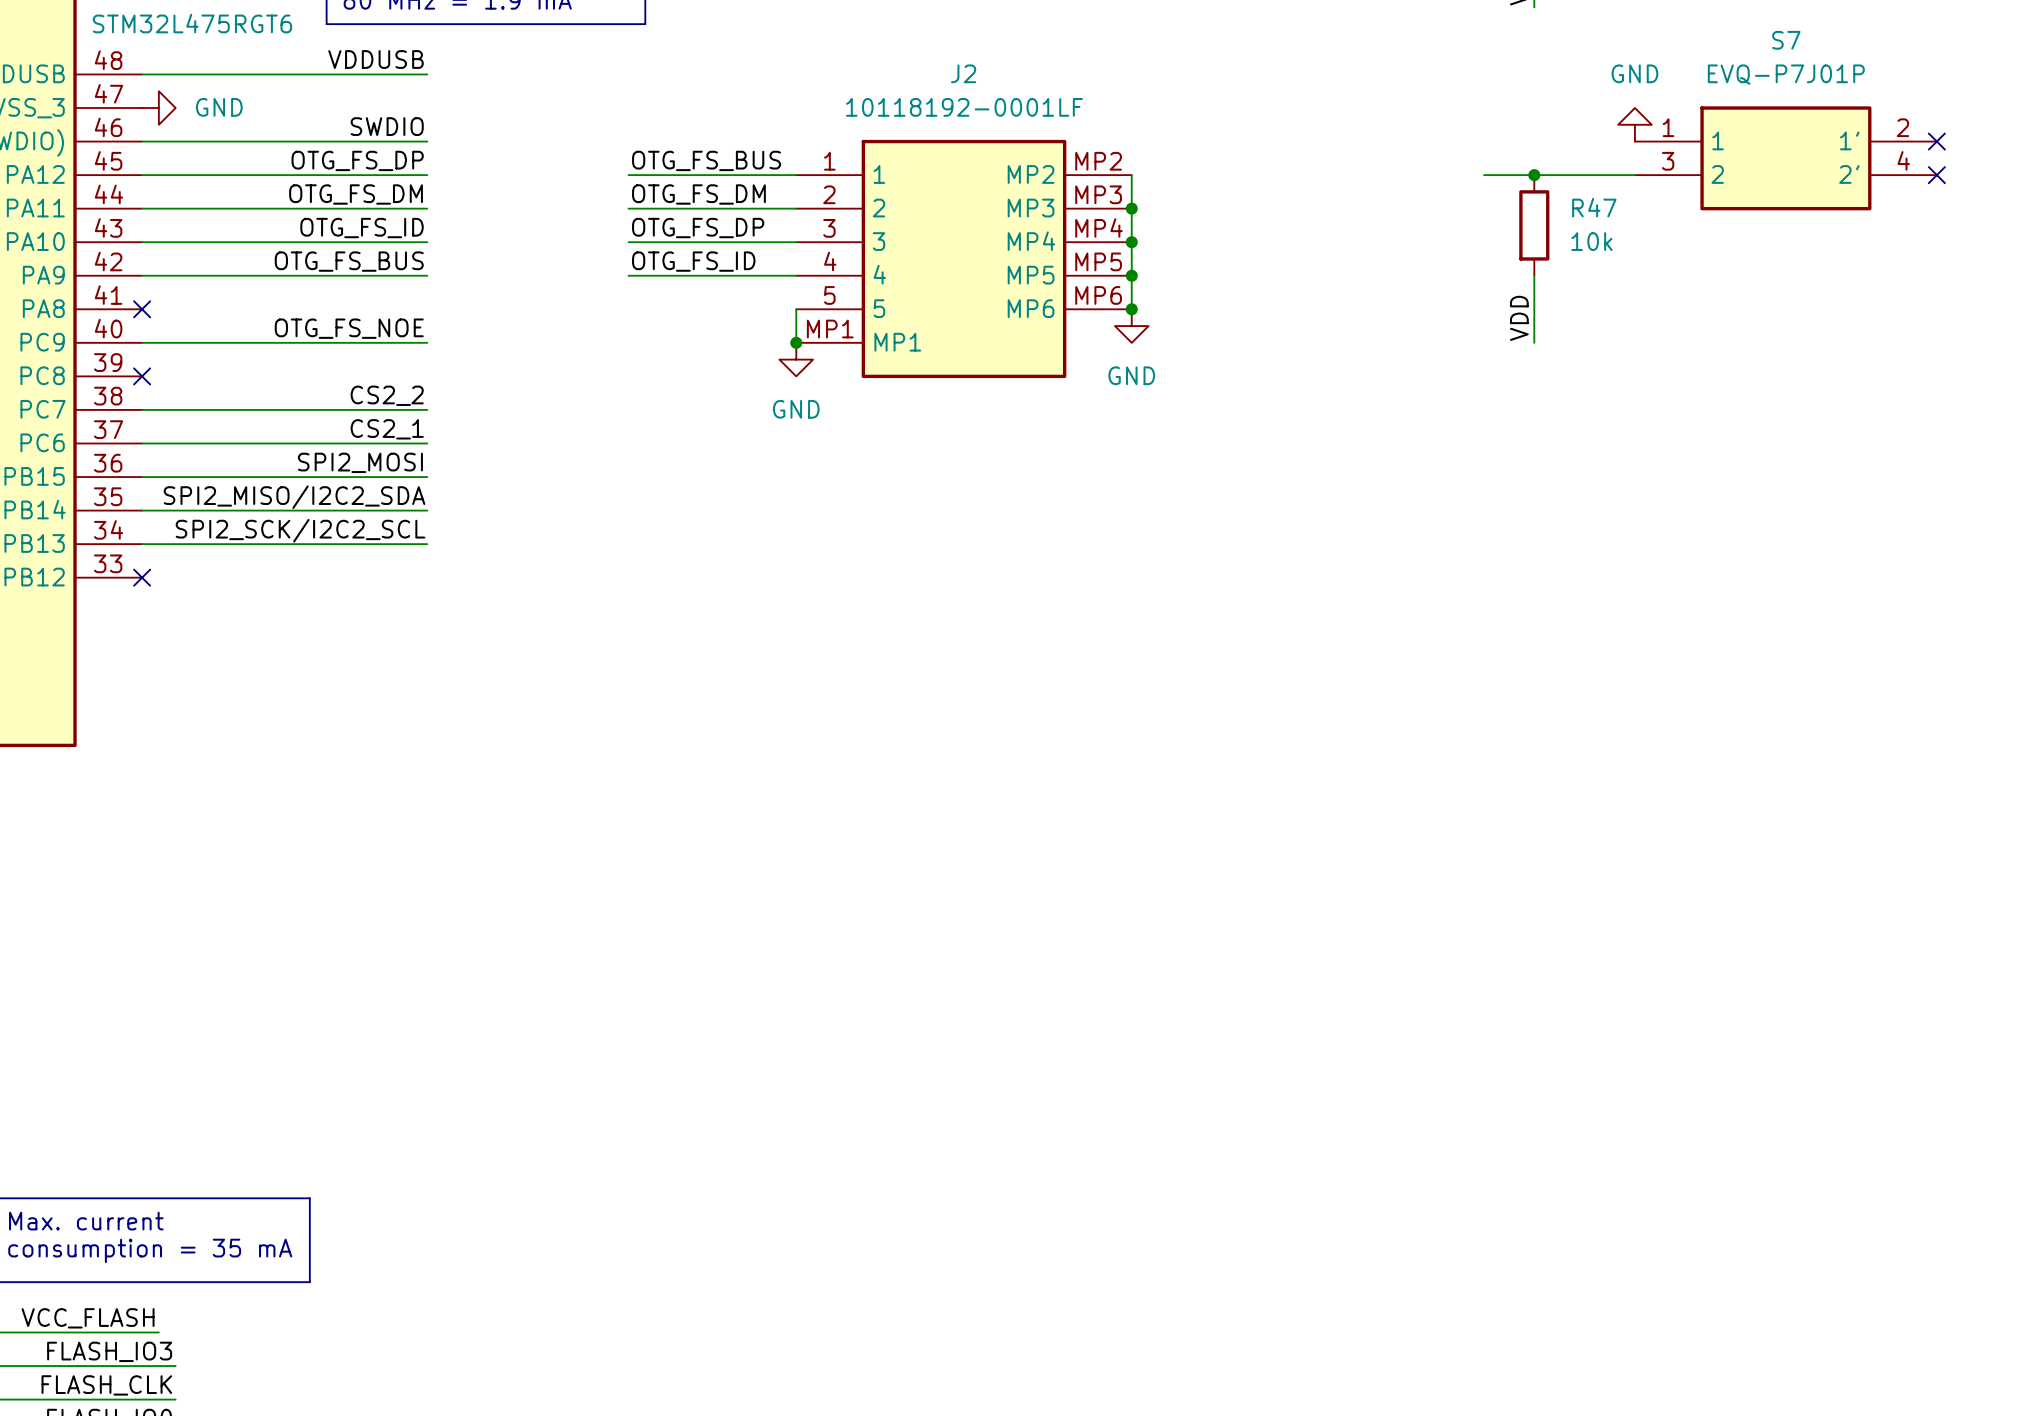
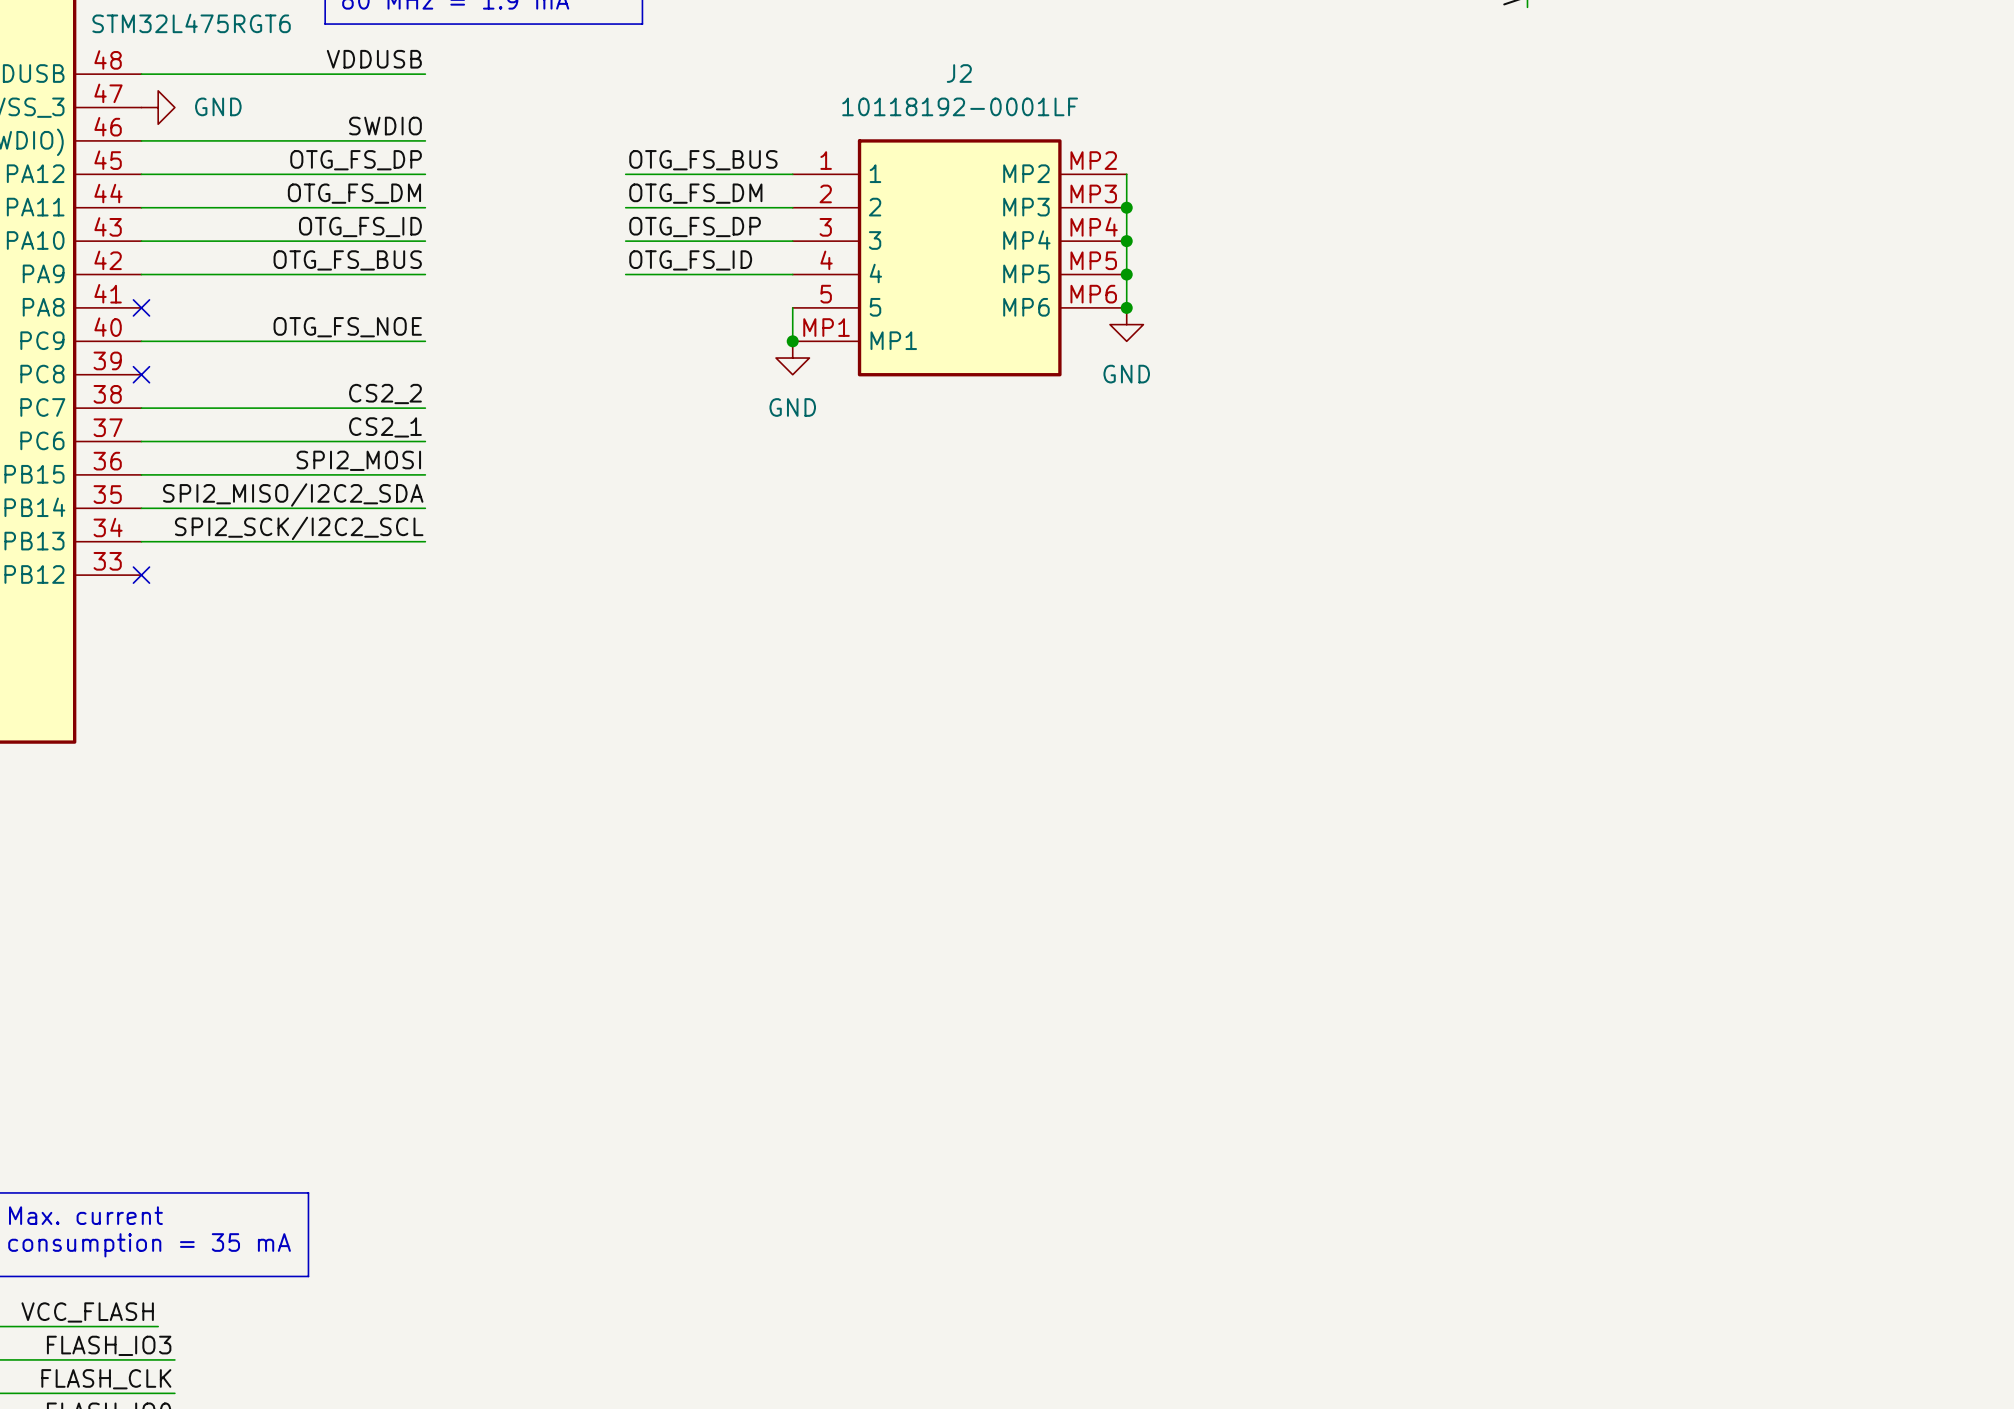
power symbol: GND (1634, 124) -> none
no-connect mark: (1936, 141) -> none
S7: EVQ-P7J01P (1785, 158) -> none
wire: (1483, 175) (1634, 175) -> none
junction: (1534, 175) -> none
no-connect mark: (1936, 175) -> none
R47: 10k (1534, 225) -> none
wire: (1534, 275) (1534, 342) -> none
label: VDD (1519, 318) -> none

